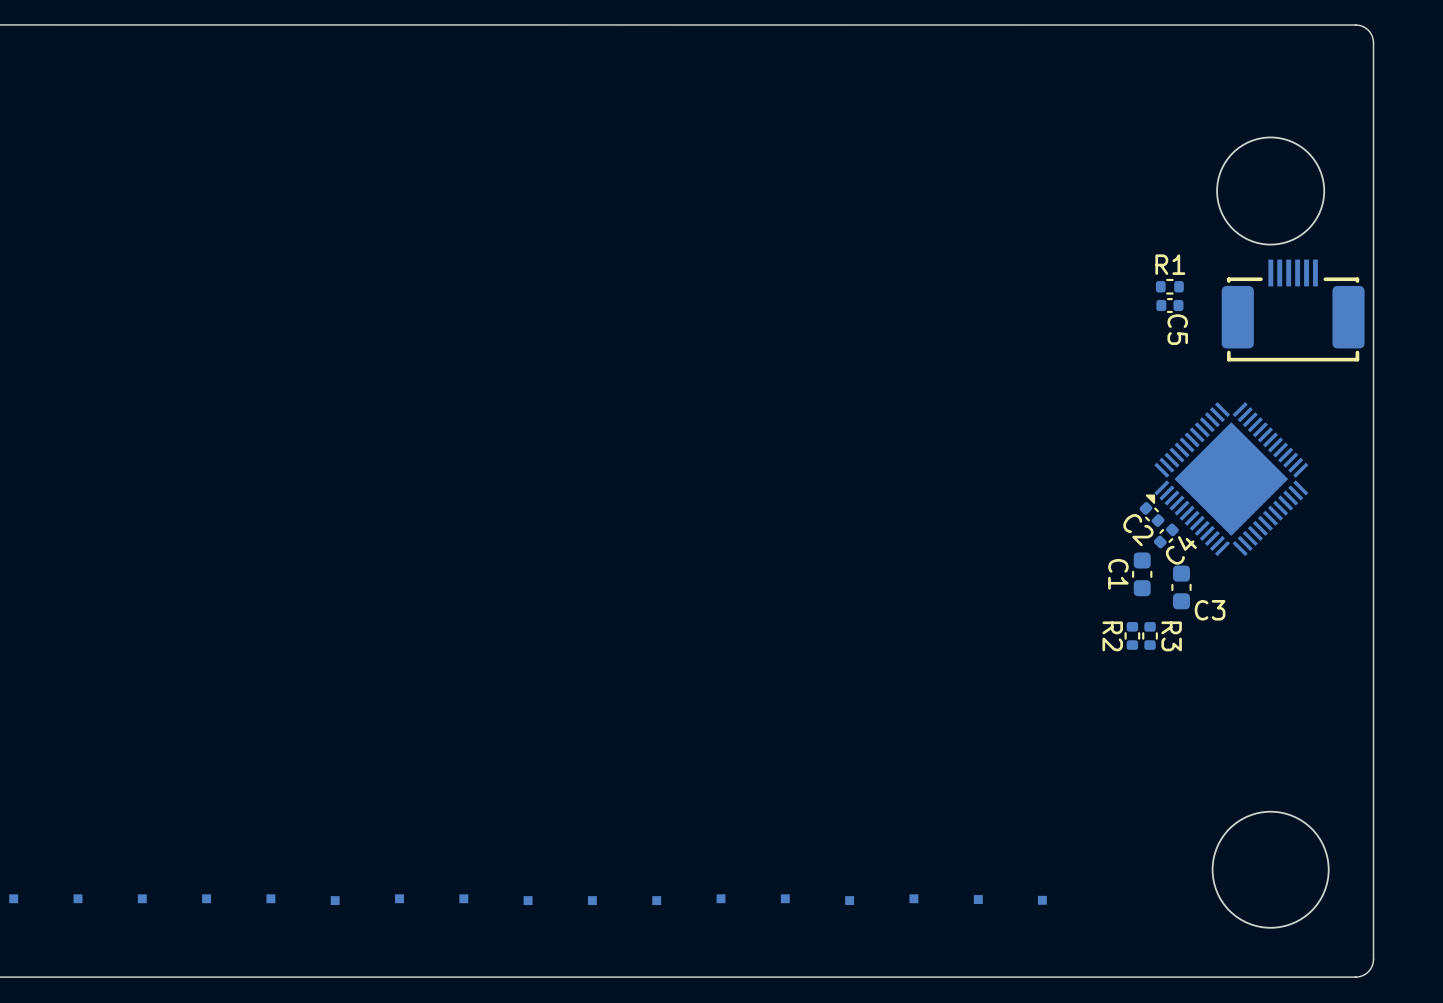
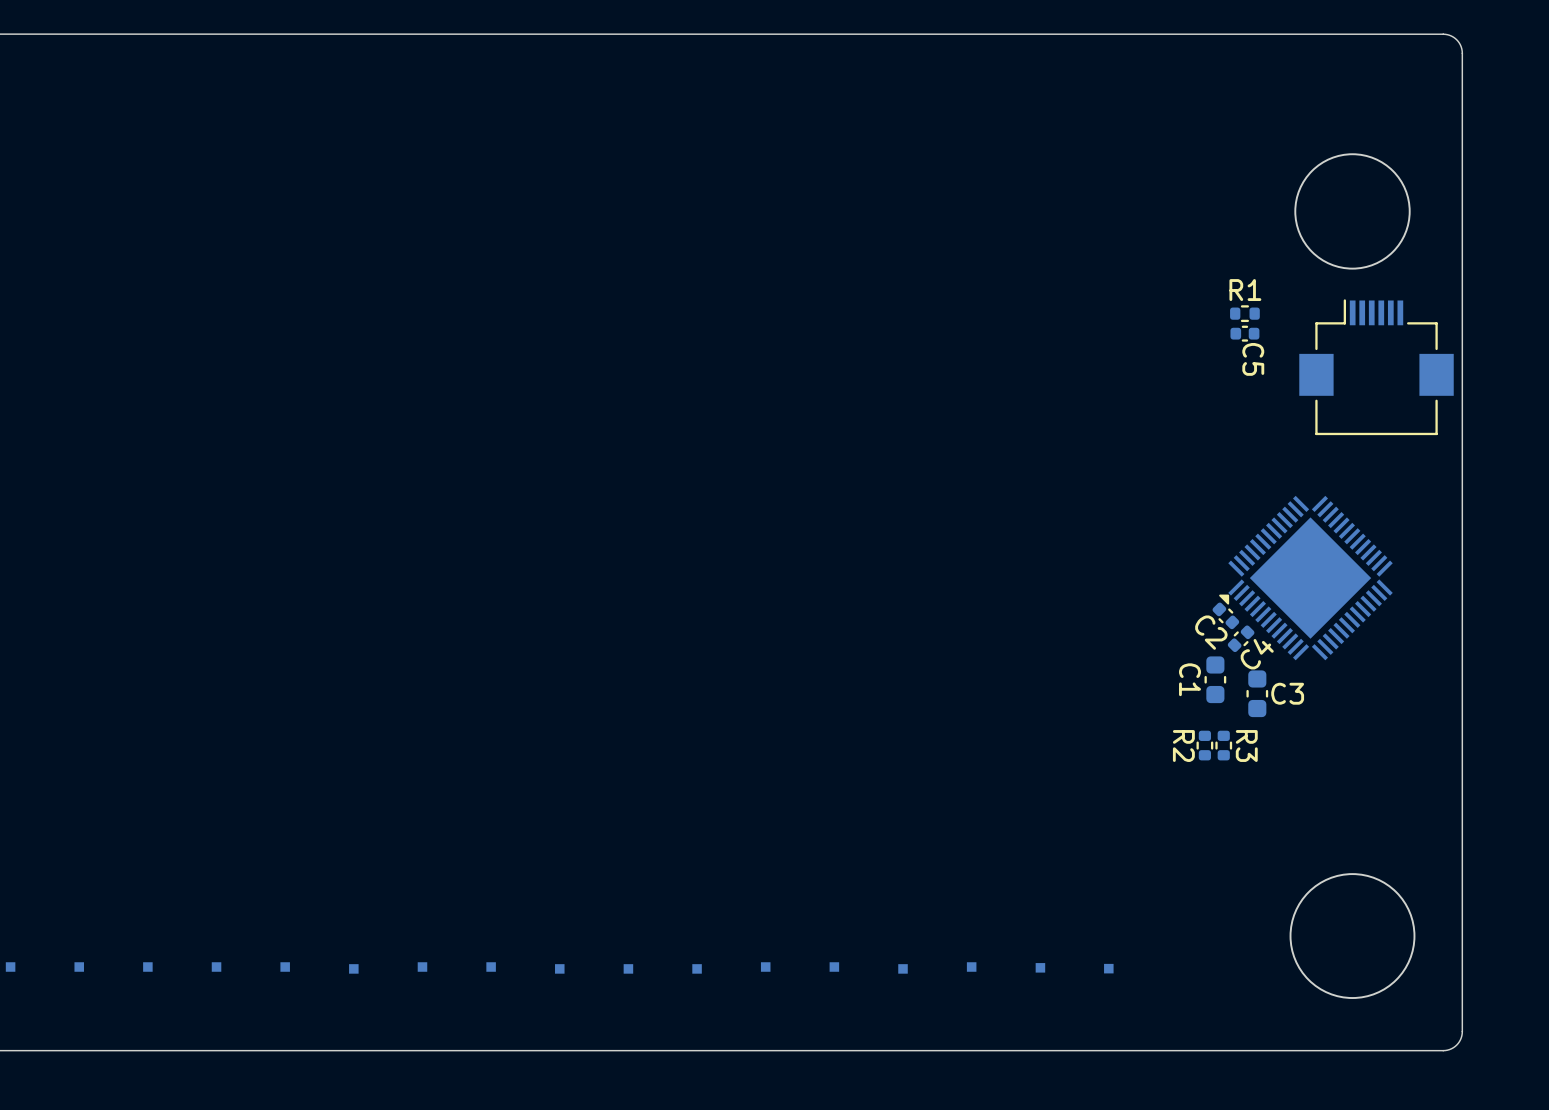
part: (1293, 310) -> none
part: none -> (1376, 367)
part position: (1227, 479) -> (1305, 578)
C2 position: (1152, 514) -> (1225, 615)
C4 position: (1166, 535) -> (1241, 638)
C1 position: (1142, 574) -> (1215, 679)
C3 position: (1181, 587) -> (1257, 693)
C3 name position: C3 (1210, 610) -> C3 (1287, 693)
R2 position: (1132, 635) -> (1204, 745)
R3 position: (1150, 635) -> (1223, 745)

